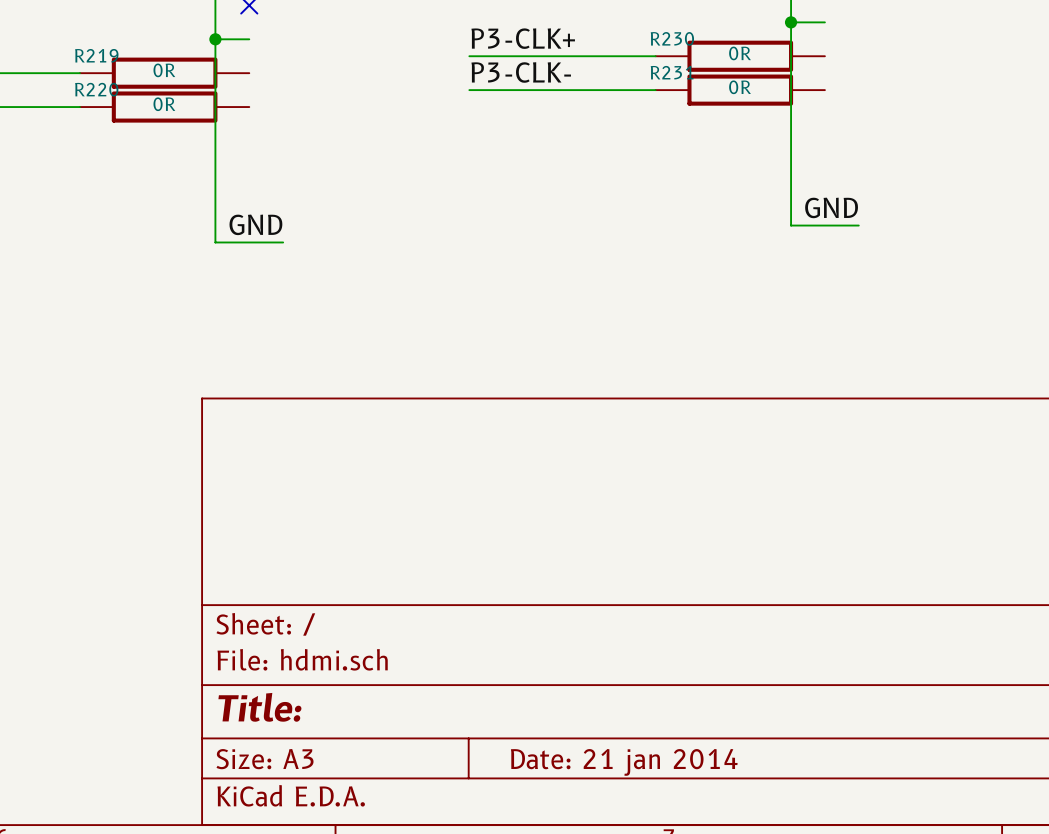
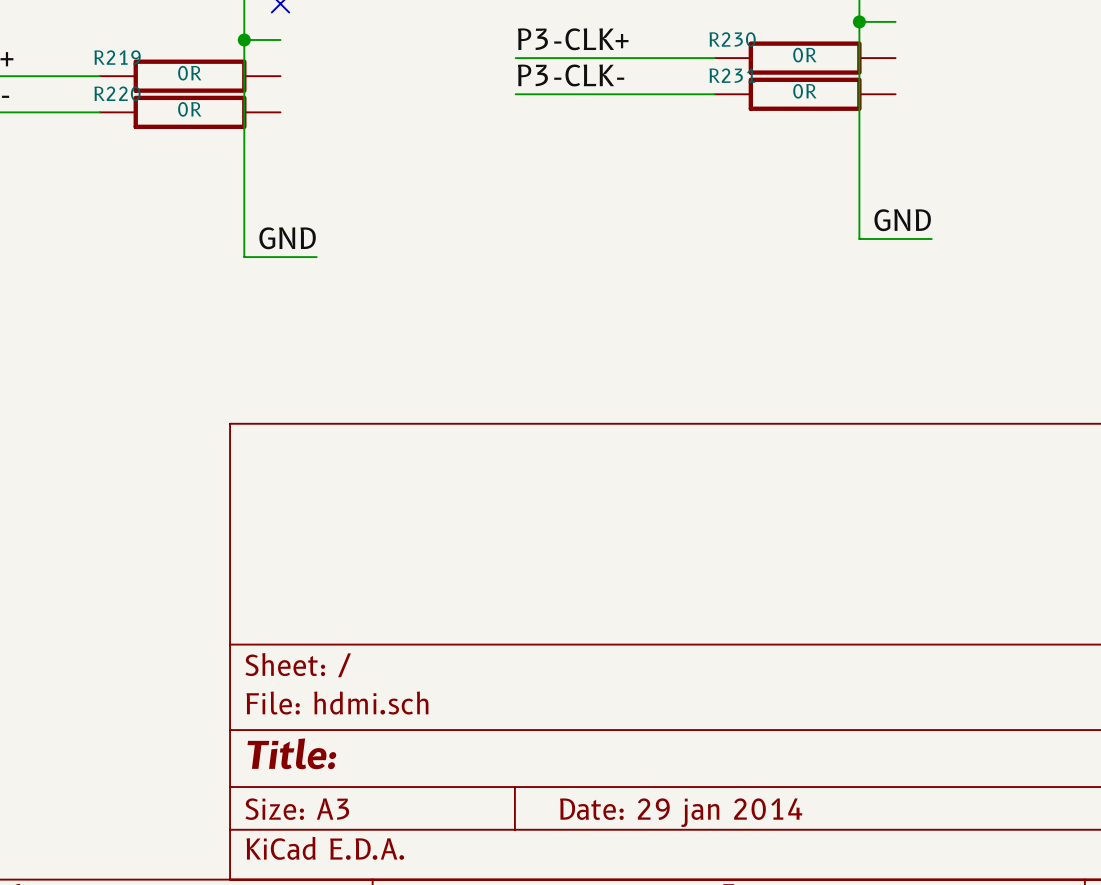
title block: Date: 21 jan 2014 (624, 762) -> Date: 29 jan 2014 (681, 812)

